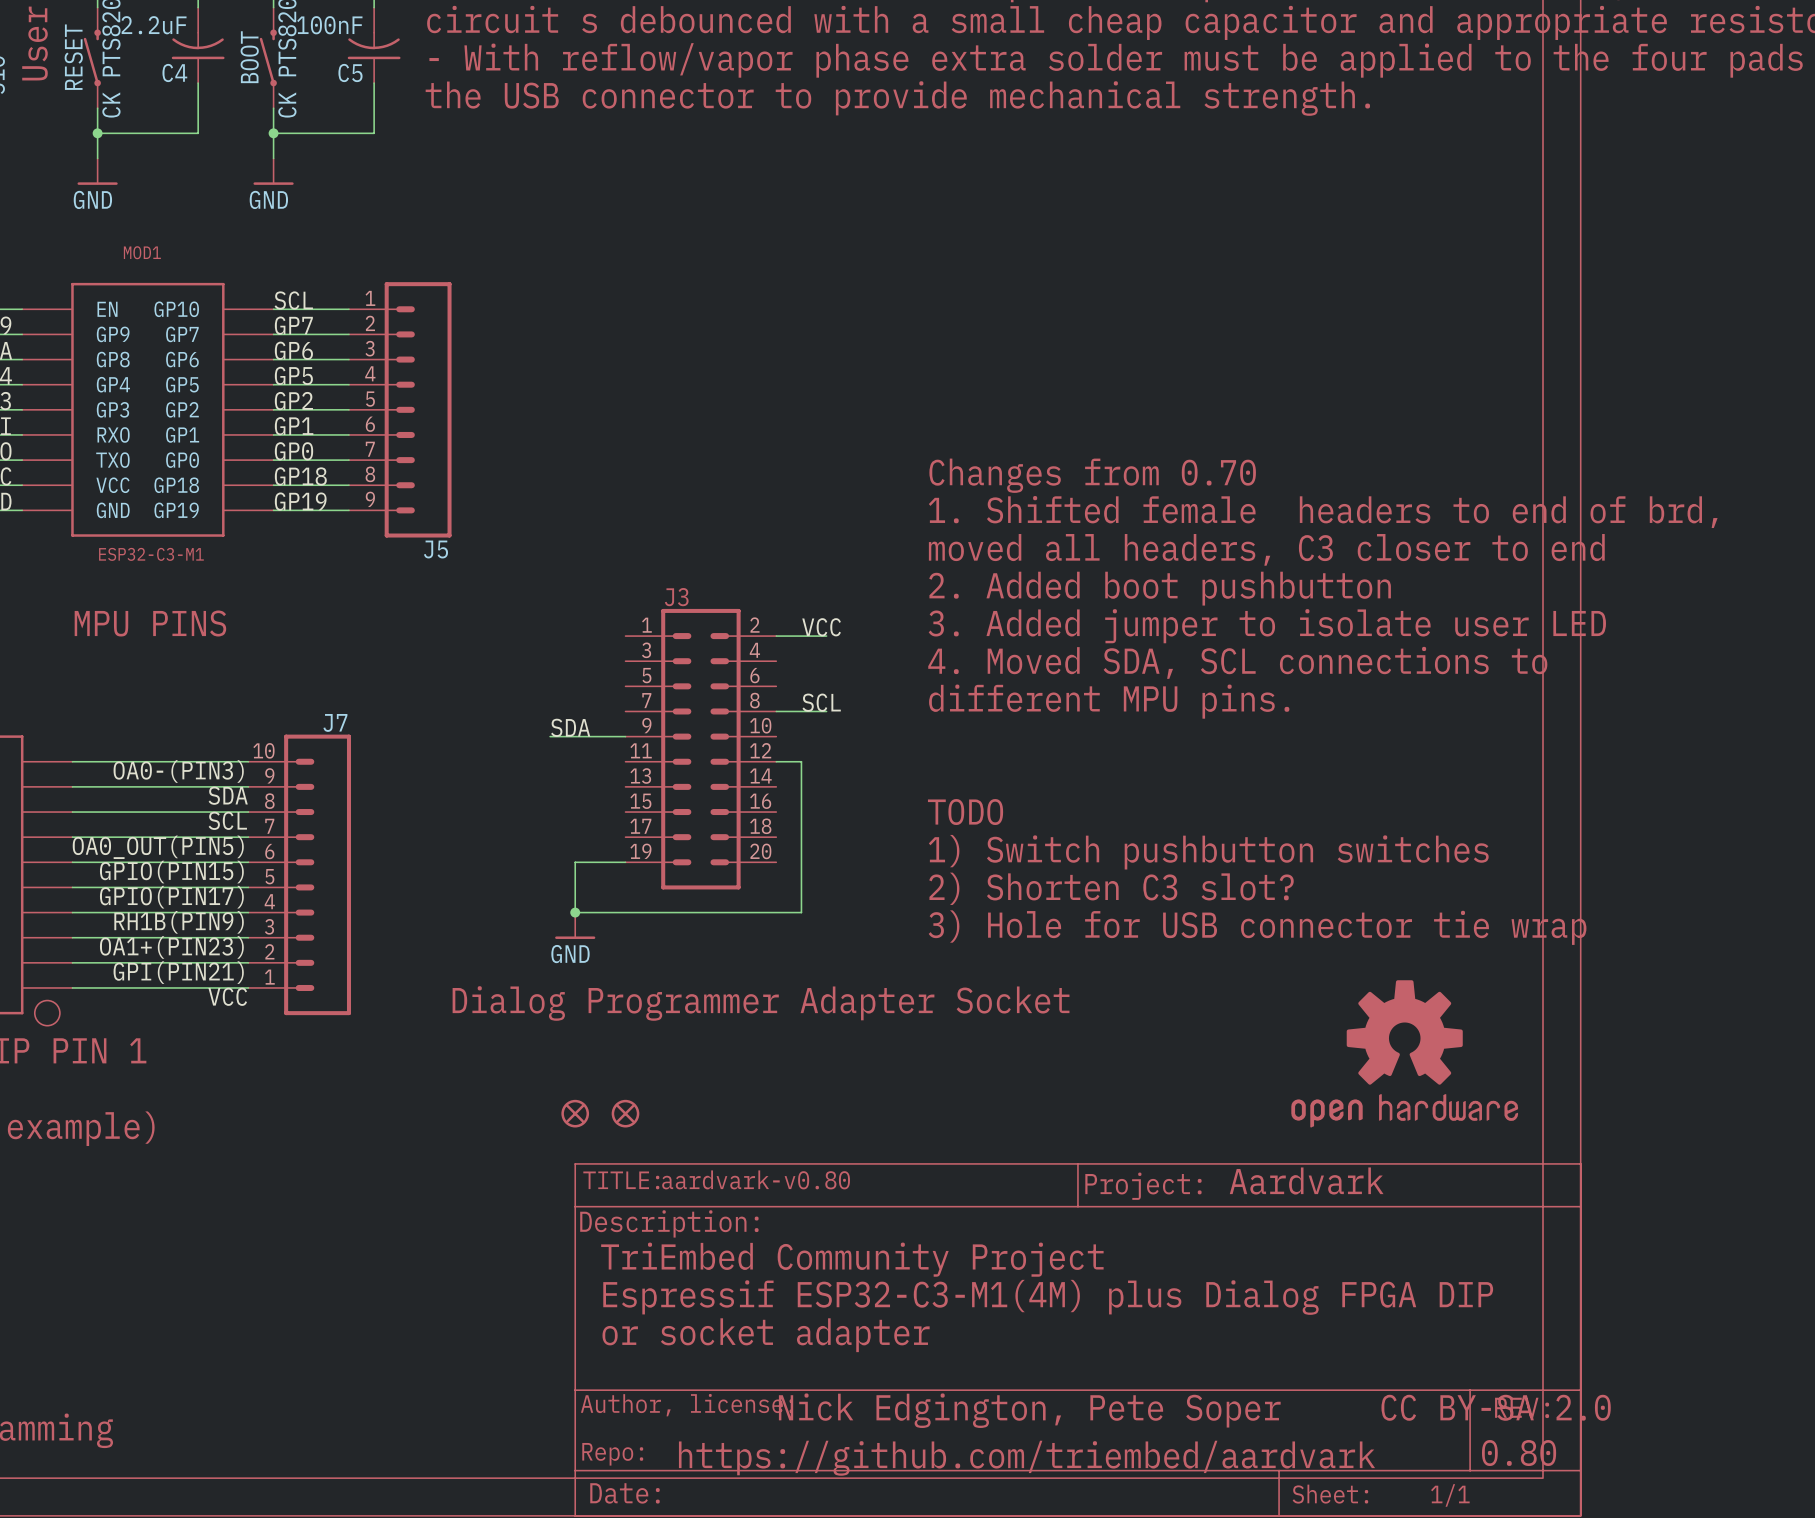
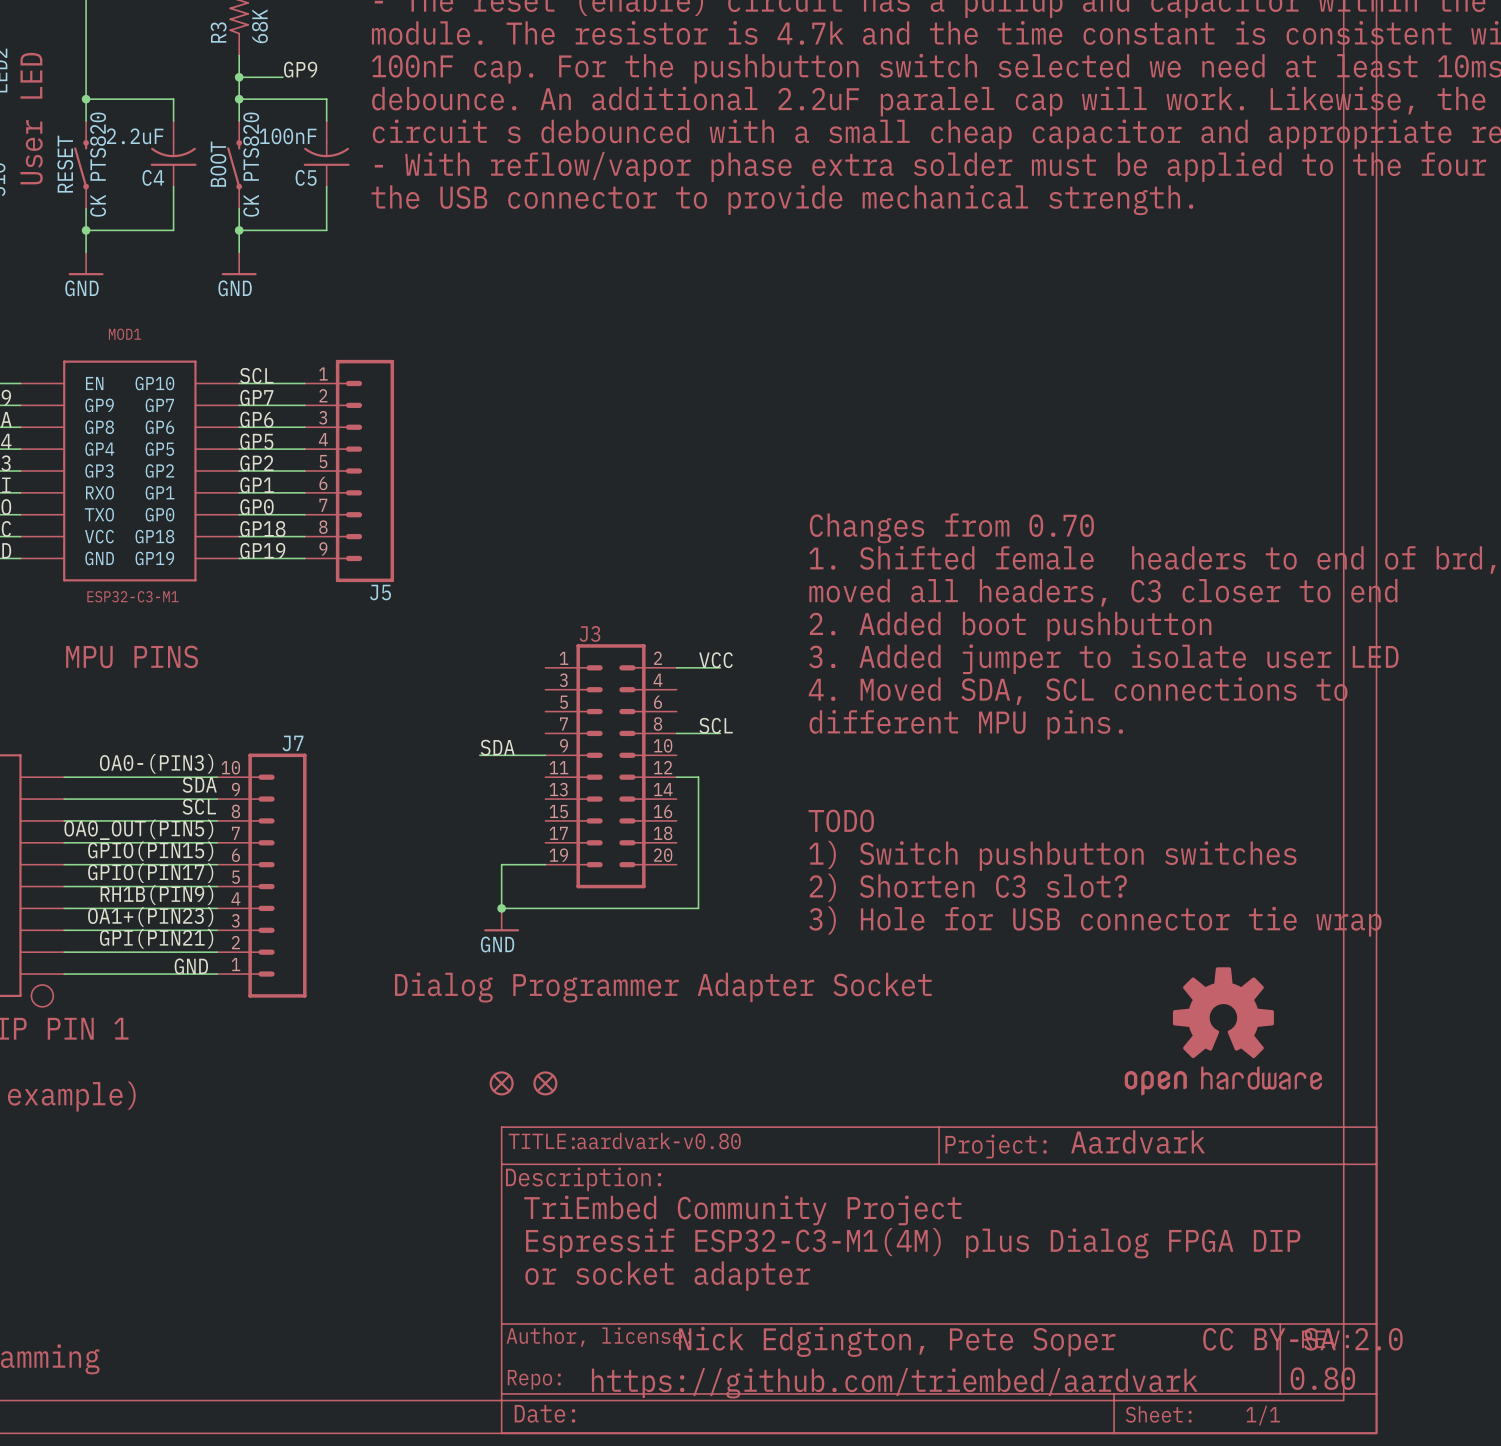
label: none -> OA0-(PIN3) (156, 763)
label: OA0-(PIN3) (178, 771) -> SDA (199, 784)
label: SDA (228, 795) -> SCL (199, 806)
label: SCL (227, 820) -> OA0_OUT(PIN5) (138, 829)
label: OA0_OUT(PIN5) (158, 847) -> GPIO(PIN15) (150, 851)
label: GPIO(PIN15) (171, 872) -> GPIO(PIN17) (150, 873)
label: GPIO(PIN17) (171, 897) -> RH1B(PIN9) (156, 895)
label: RH1B(PIN9) (179, 922) -> OA1+(PIN23) (150, 916)
label: OA1+(PIN23) (171, 947) -> GPI(PIN21) (156, 938)
label: GPI(PIN21) (178, 972) -> none
label: none -> GND (191, 966)
label: VCC (227, 996) -> none

